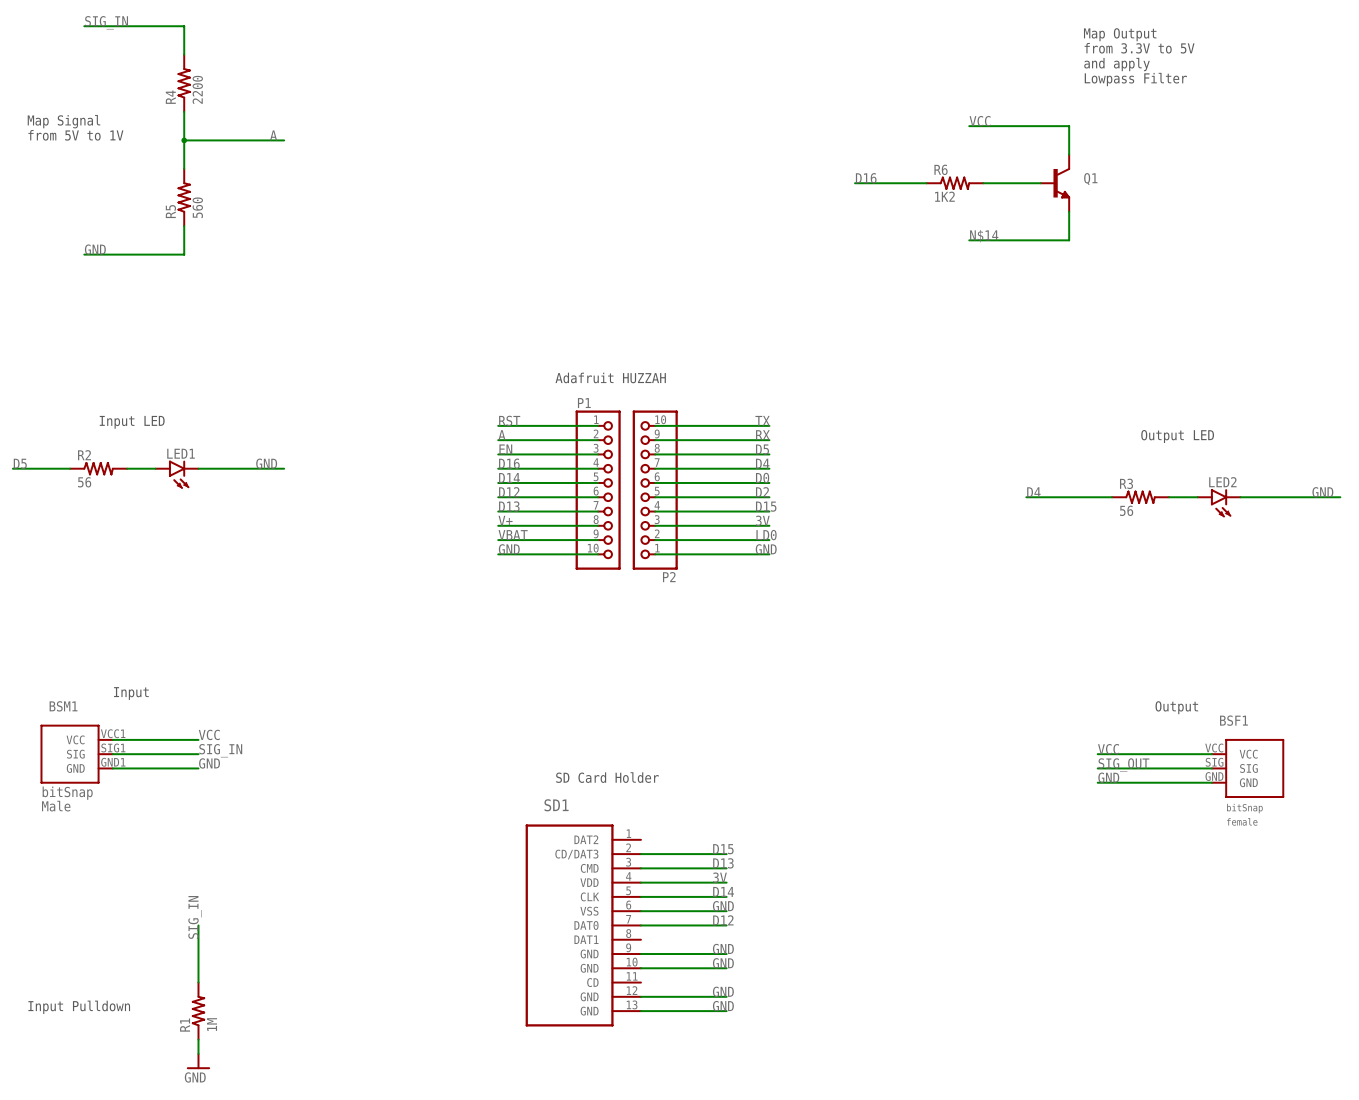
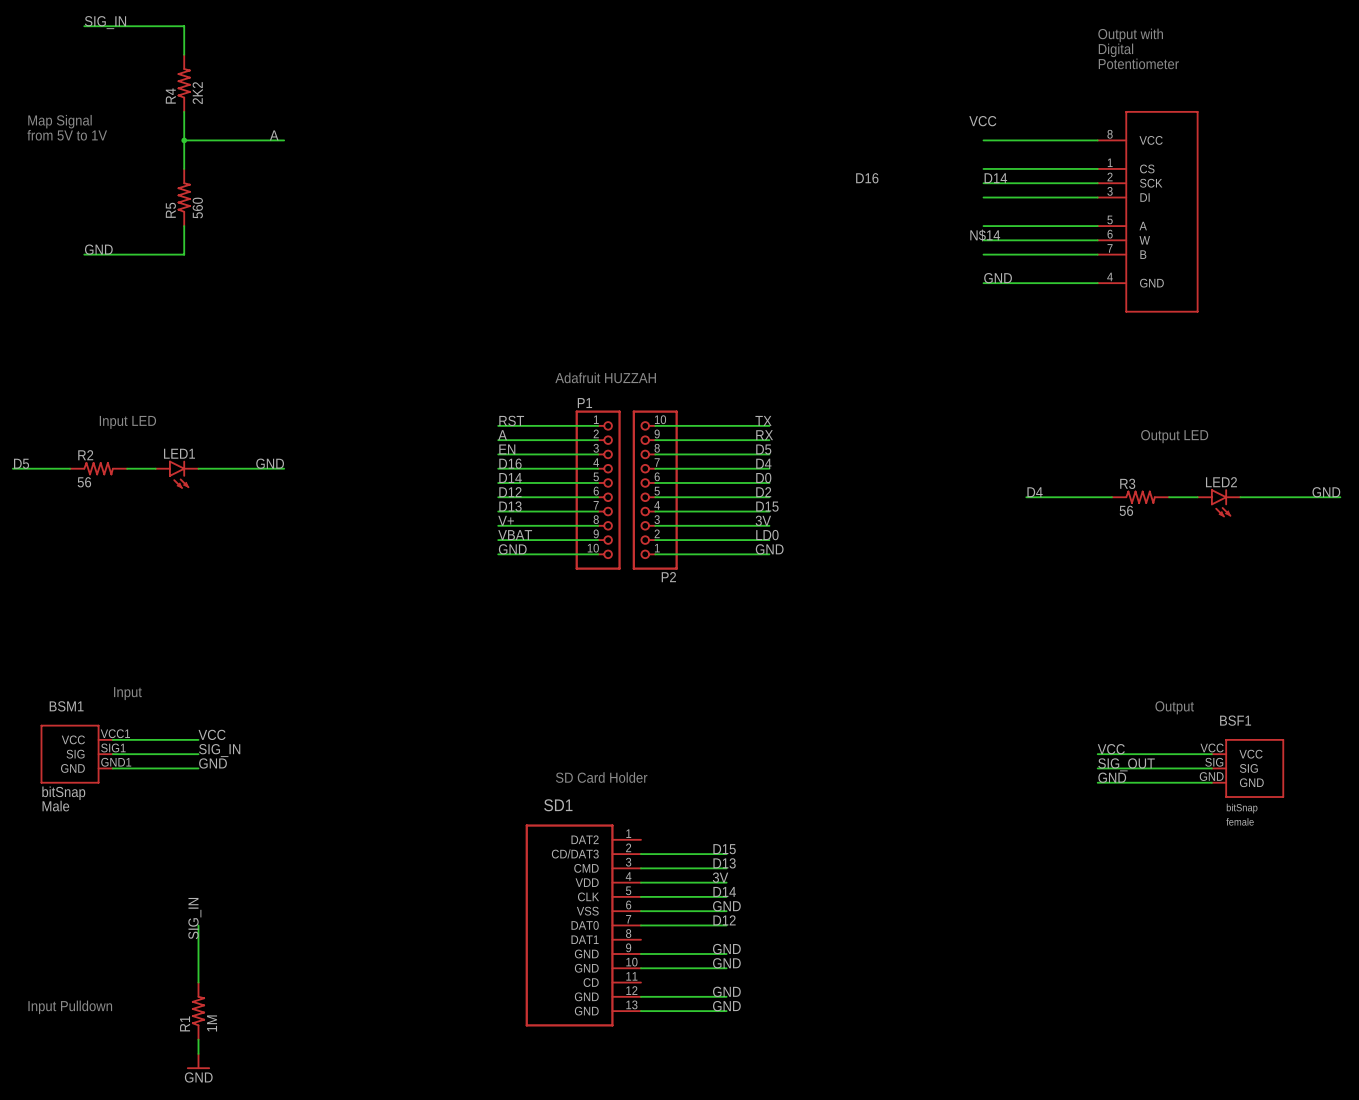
text: Map Output (1120, 34) -> none
text: none -> Output with (1130, 35)
text: from 3.3V to 5V (1139, 48) -> none
text: none -> Digital (1115, 50)
text: none -> Potentiometer (1138, 63)
text: and apply (1117, 64) -> none
text: Lowpass Filter (1135, 79) -> none
R4 value: 2200 (197, 89) -> 2K2 (197, 93)
wire: (969, 126) (1069, 126) (1069, 154) -> none
wire: none -> (983, 140) (1097, 140)
wire: none -> (983, 168) (1097, 168)
label: none -> D14 (995, 178)
wire: (855, 183) (926, 183) -> none
R6: 1K2 (954, 183) -> none
wire: none -> (1040, 183) (1097, 183)
Q1: (1055, 183) -> none
wire: none -> (983, 197) (1097, 197)
wire: (1069, 211) (1069, 240) -> (1097, 240) (1069, 240)
part: none -> (1148, 211)
wire: none -> (983, 226) (1097, 226)
wire: (969, 240) (983, 240) -> none
wire: none -> (983, 254) (1097, 254)
label: none -> GND (998, 278)
wire: none -> (983, 283) (1097, 283)

